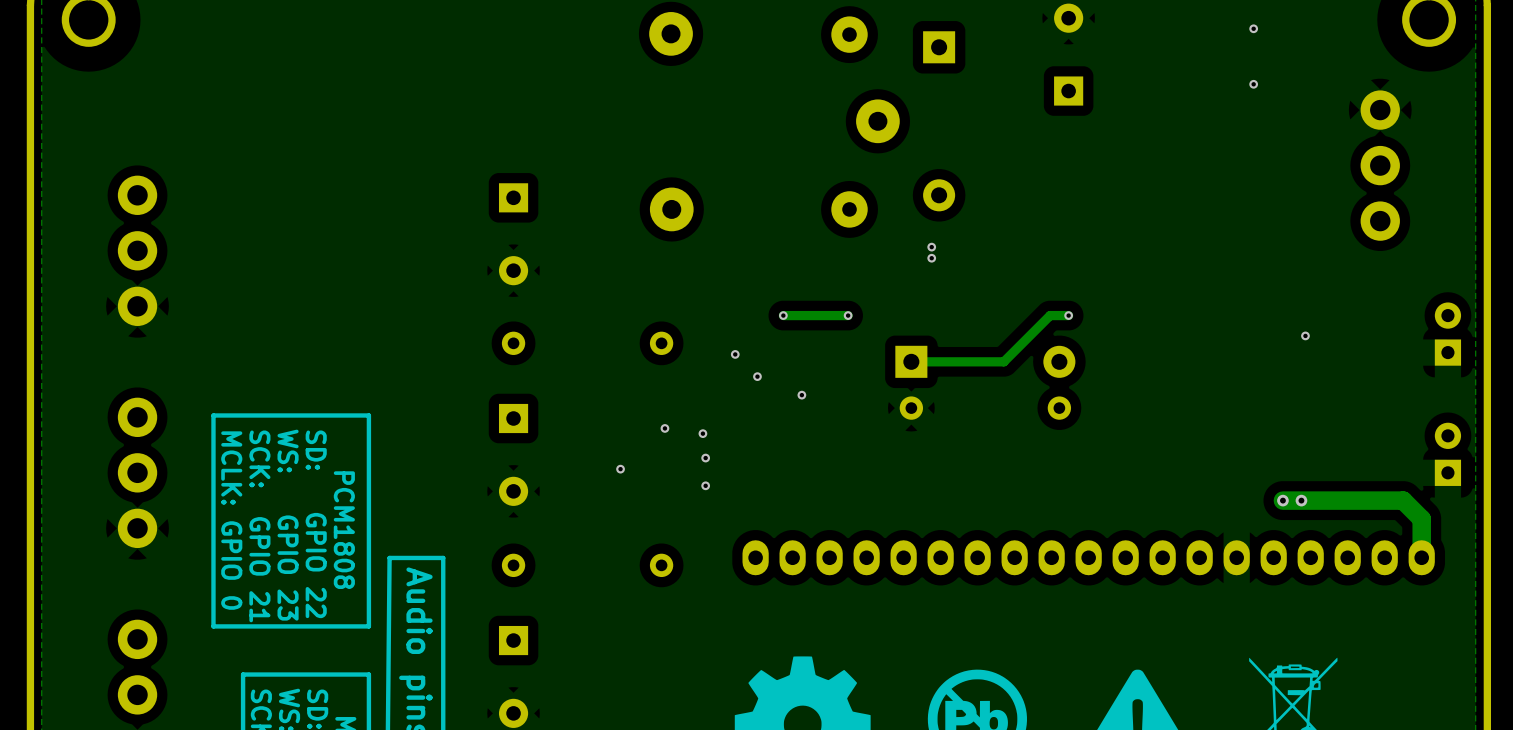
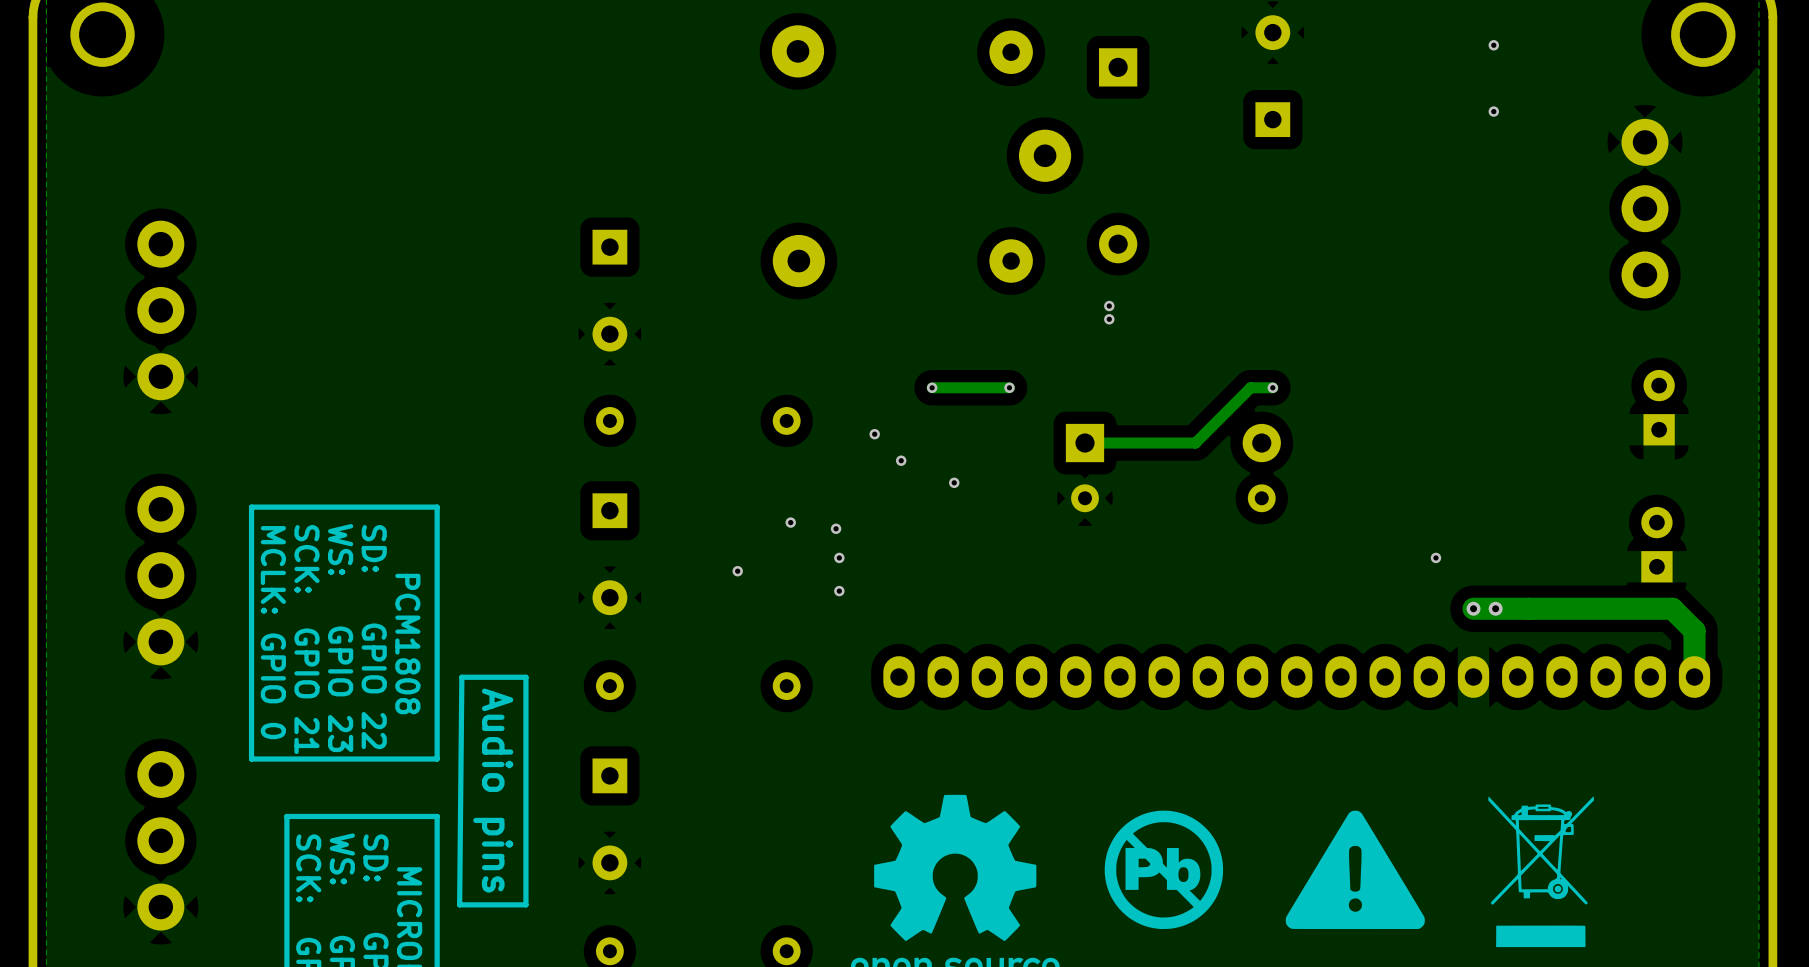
part position: (1447, 334) -> (1659, 407)
via: (1305, 335) -> none
part position: (1447, 454) -> (1656, 544)
via: none -> (1435, 557)
via: none -> (1473, 608)
via: none -> (1495, 608)
track: none -> (1528, 608) (1473, 608)
via: (1282, 500) -> none
via: (1301, 500) -> none

